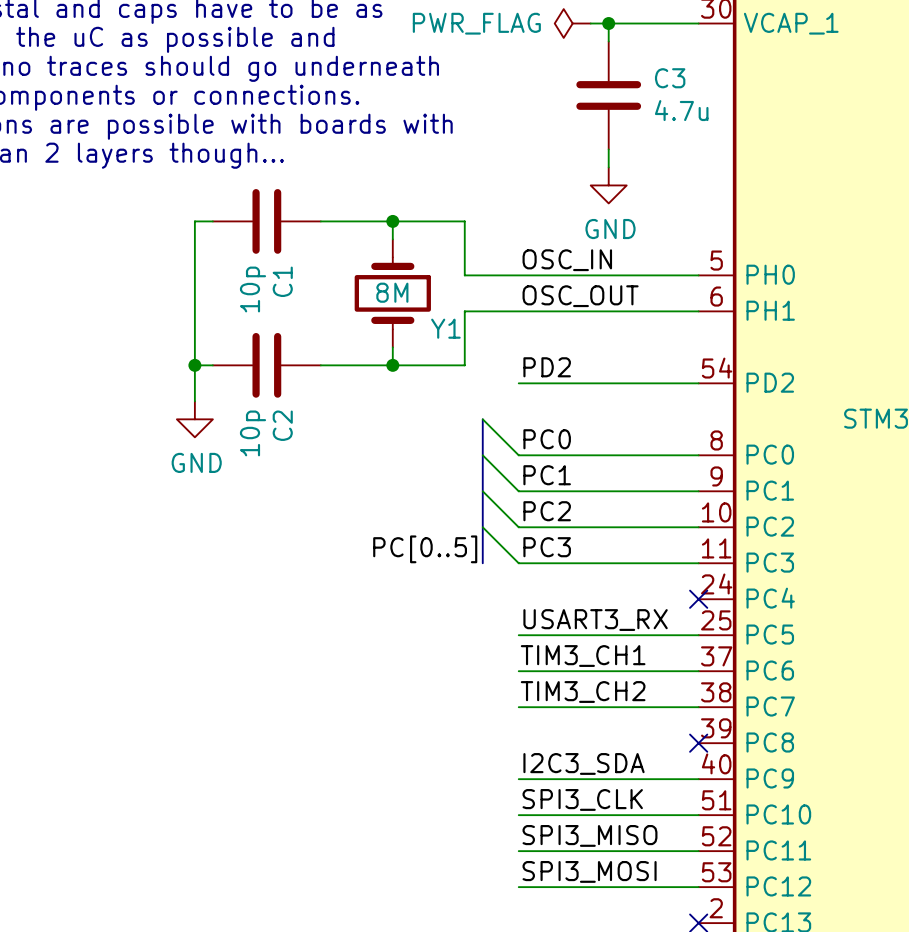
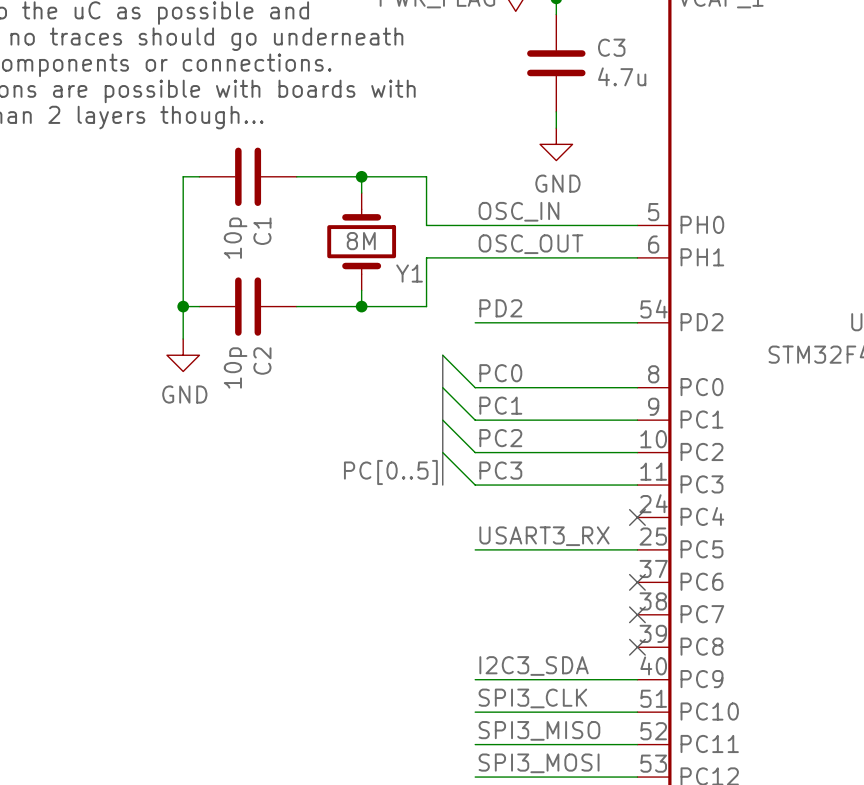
label: TIM3_CH1 (583, 656) -> none
wire: (518, 671) (698, 671) -> none
no-connect mark: none -> (637, 582)
label: TIM3_CH2 (583, 692) -> none
wire: (518, 707) (698, 707) -> none
no-connect mark: none -> (637, 614)

